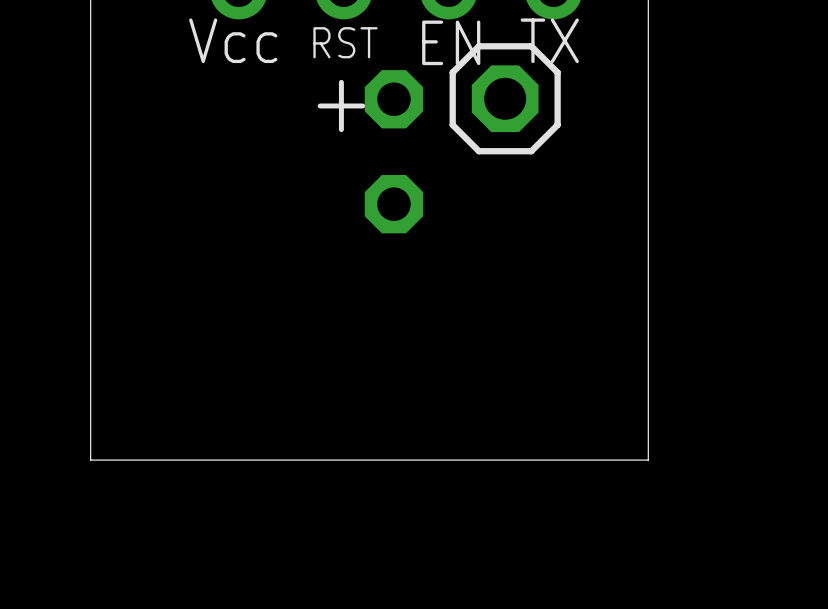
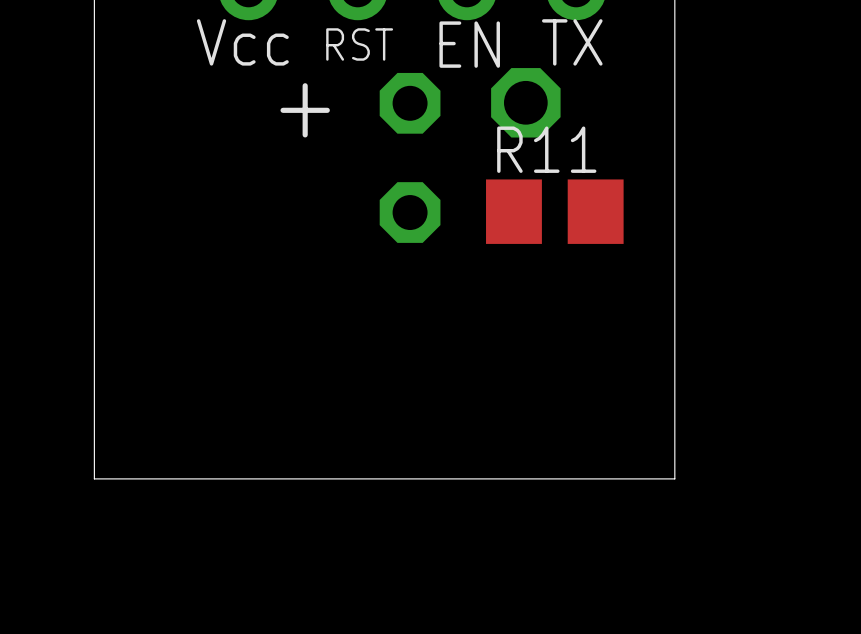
part side: top (505, 98) -> bottom (525, 102)
text position: + (341, 105) -> + (305, 110)
R11: none -> (554, 211)

